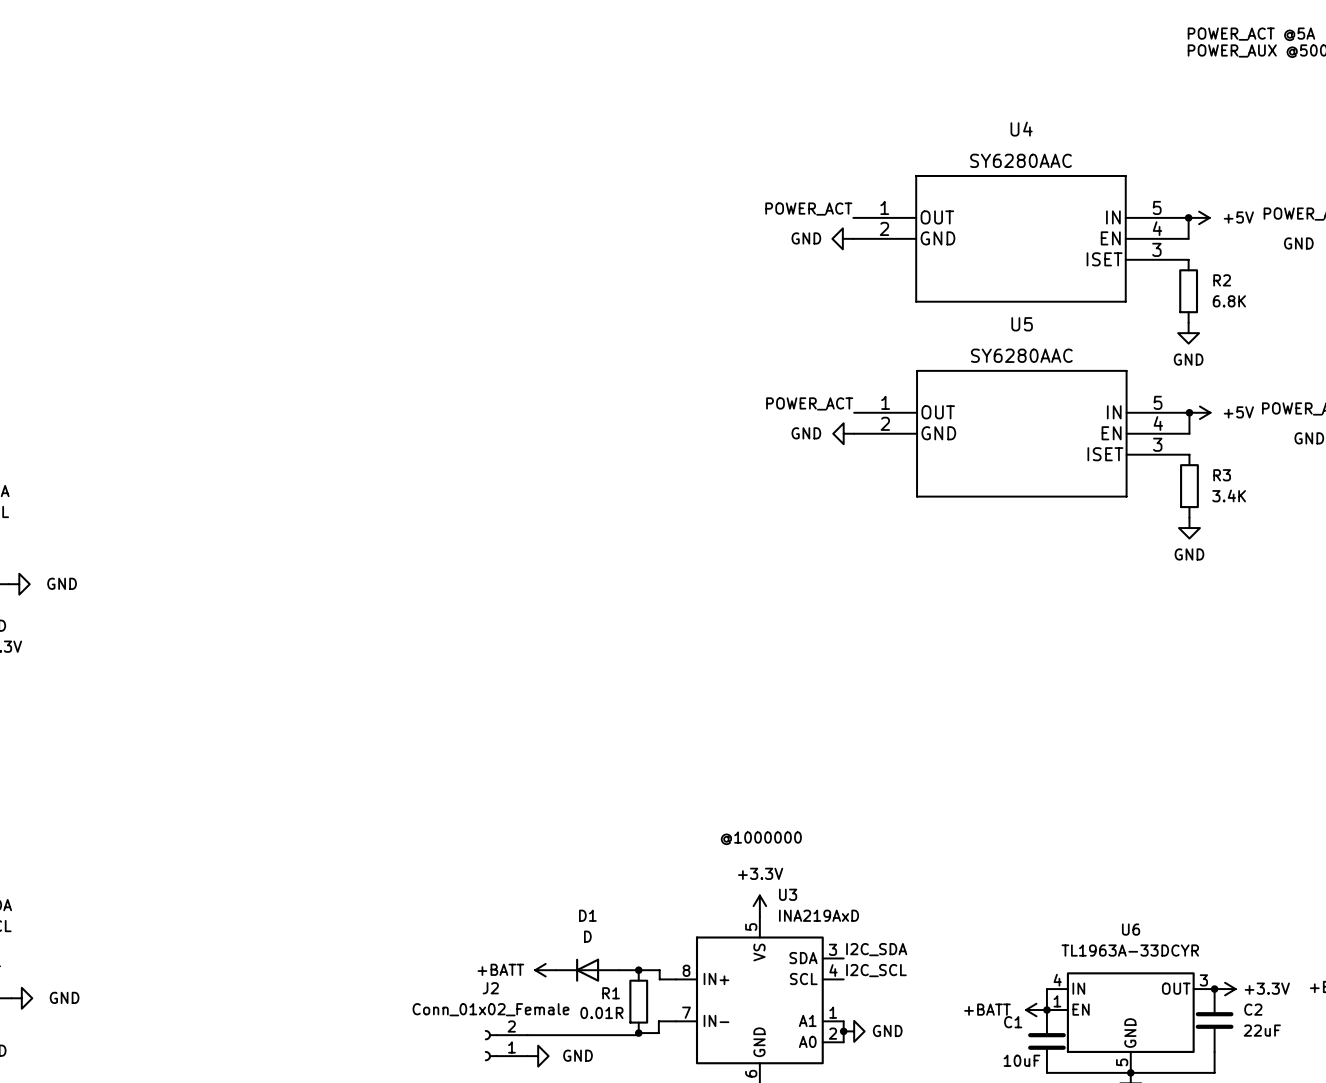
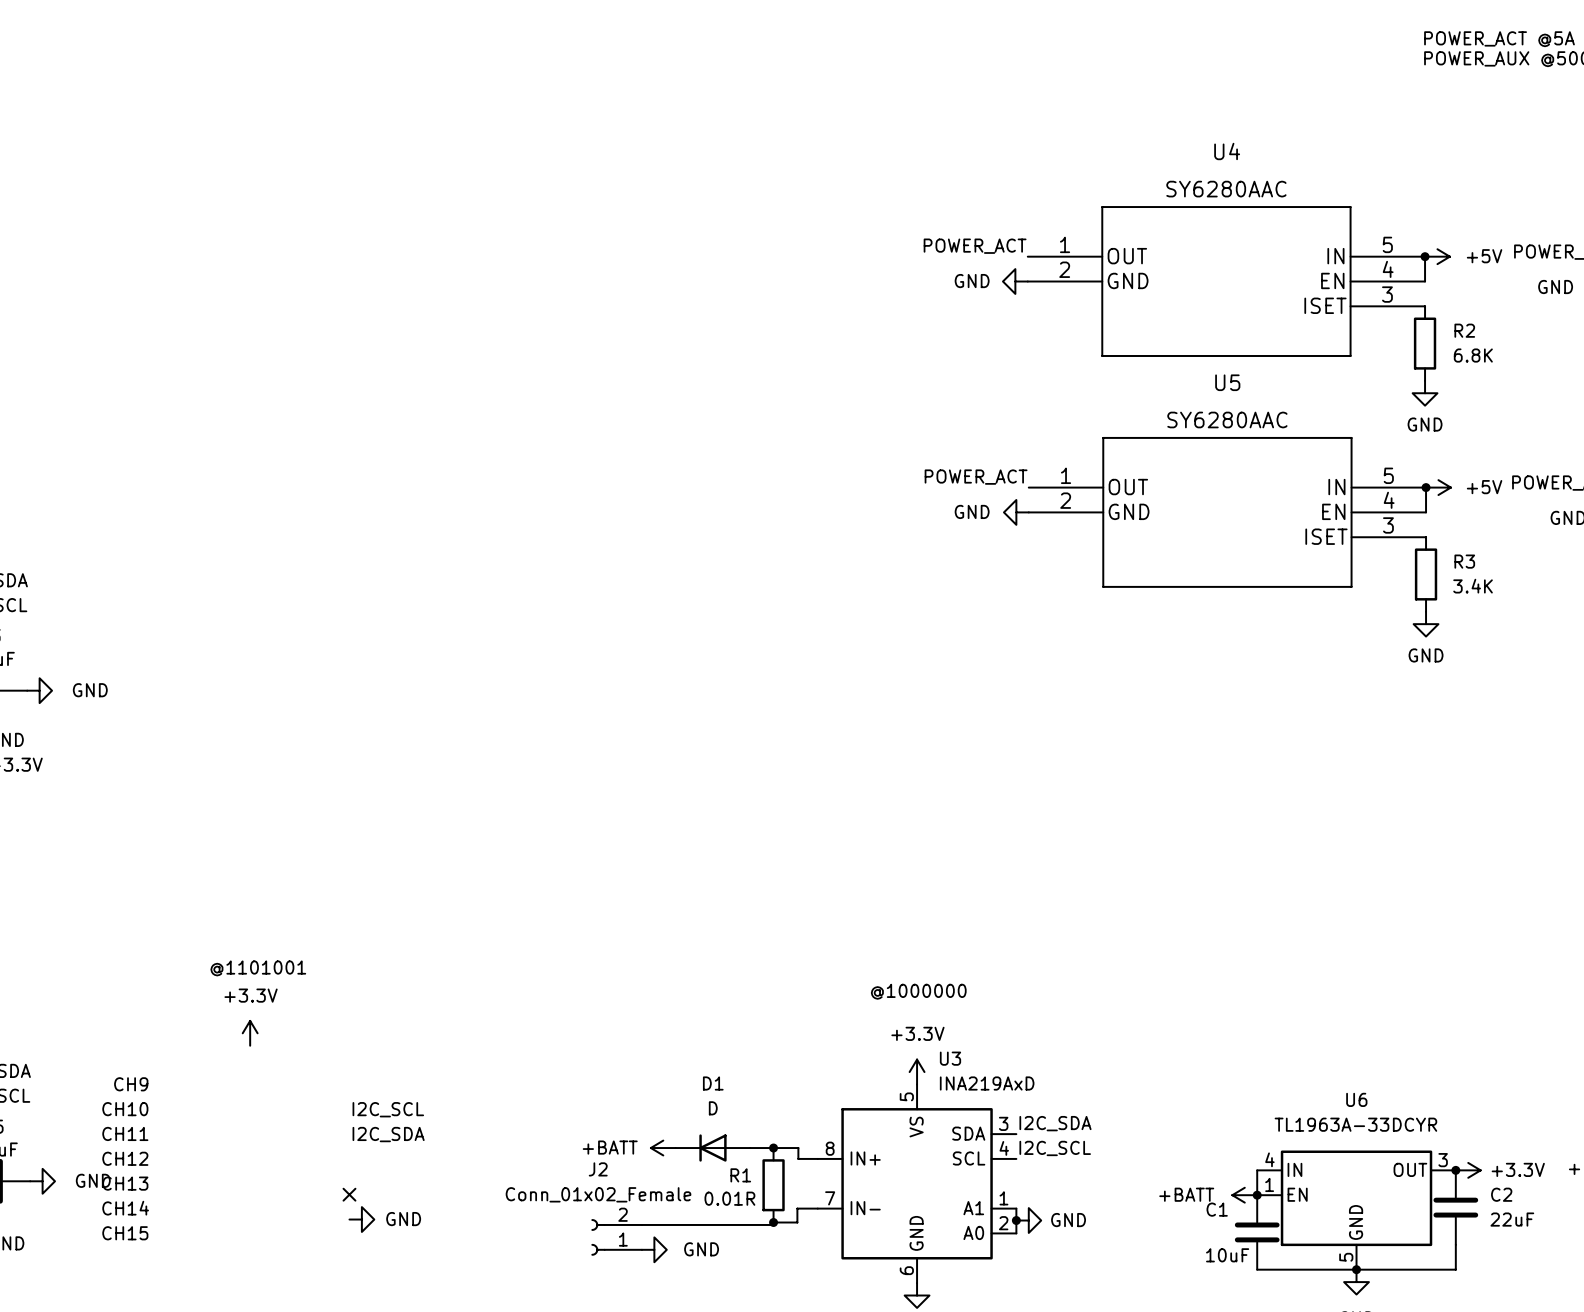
text: none -> @1101001 (258, 968)
power symbol: none -> +3.3V (250, 1033)
label: none -> CH9 (131, 1084)
label: none -> CH10 (125, 1109)
label: none -> I2C_SCL (388, 1109)
label: none -> CH11 (125, 1133)
label: none -> I2C_SDA (388, 1134)
label: none -> CH12 (125, 1158)
label: none -> CH13 (125, 1183)
no-connect mark: none -> (349, 1194)
label: none -> CH14 (125, 1208)
power symbol: none -> GND (361, 1219)
label: none -> CH15 (125, 1233)

